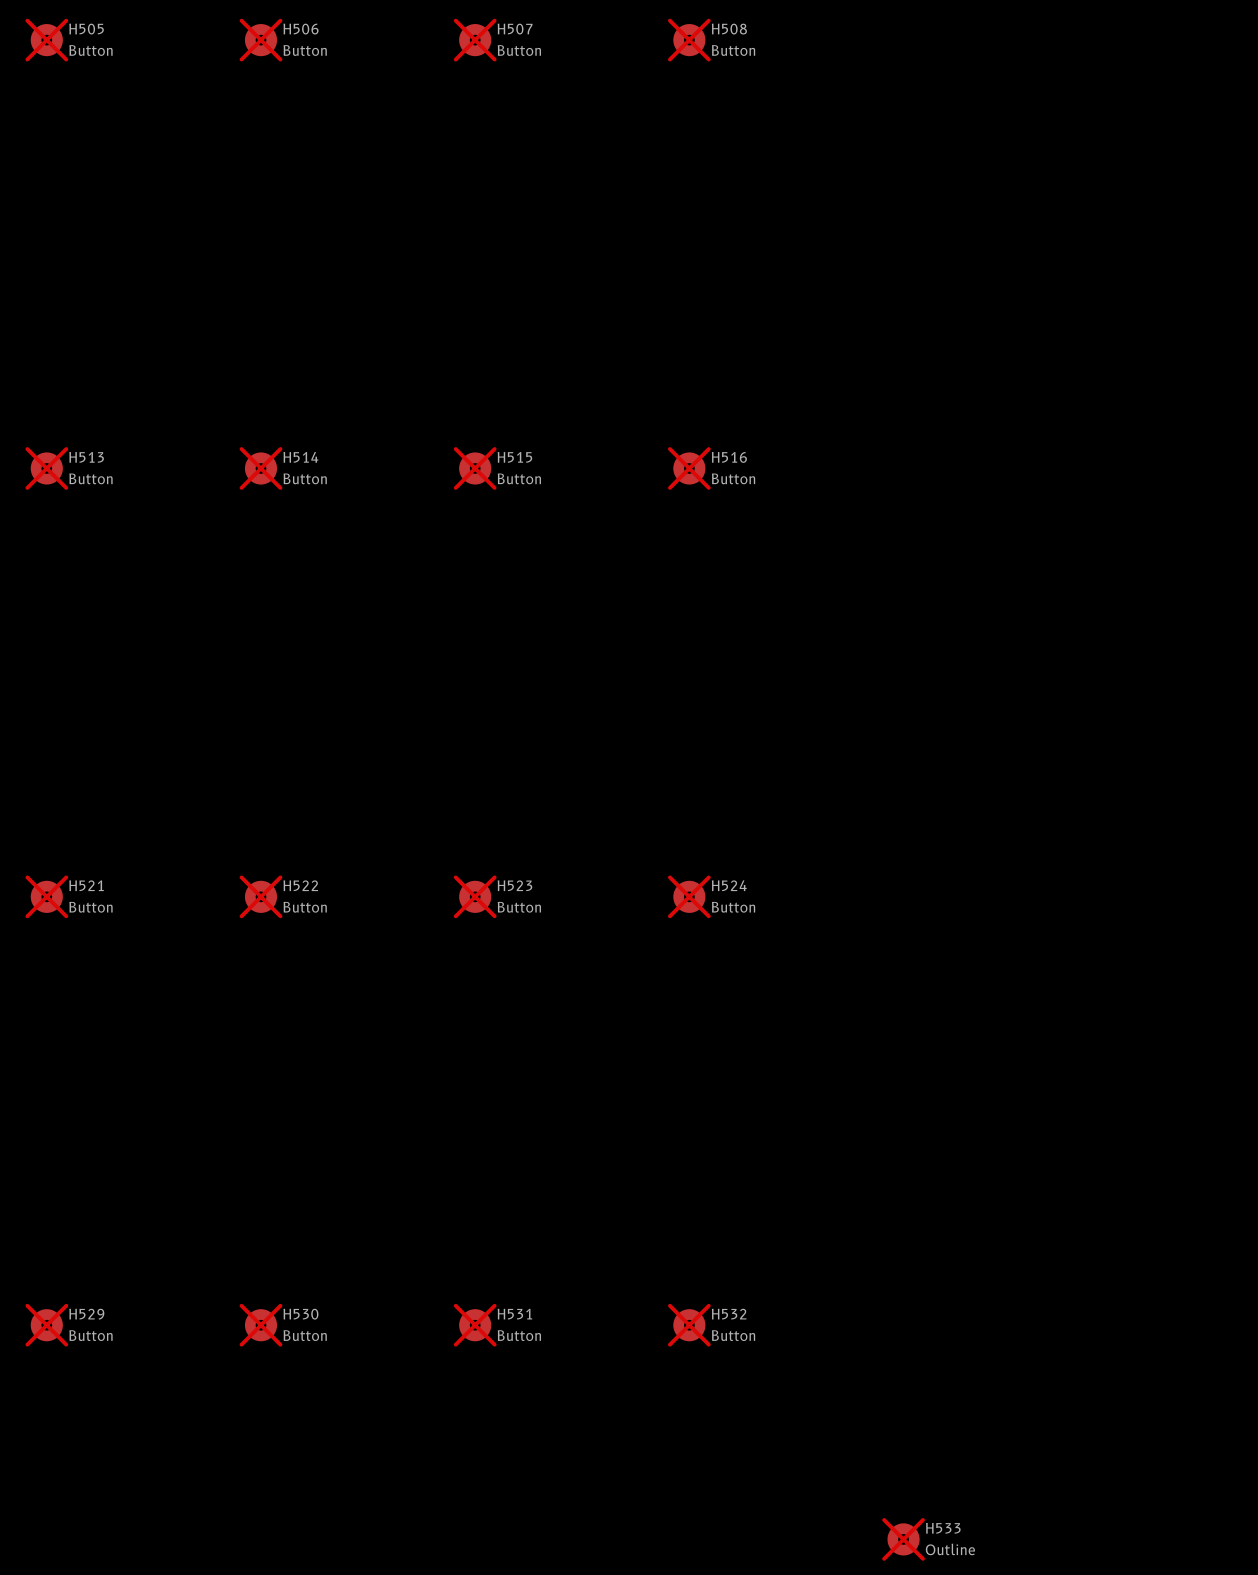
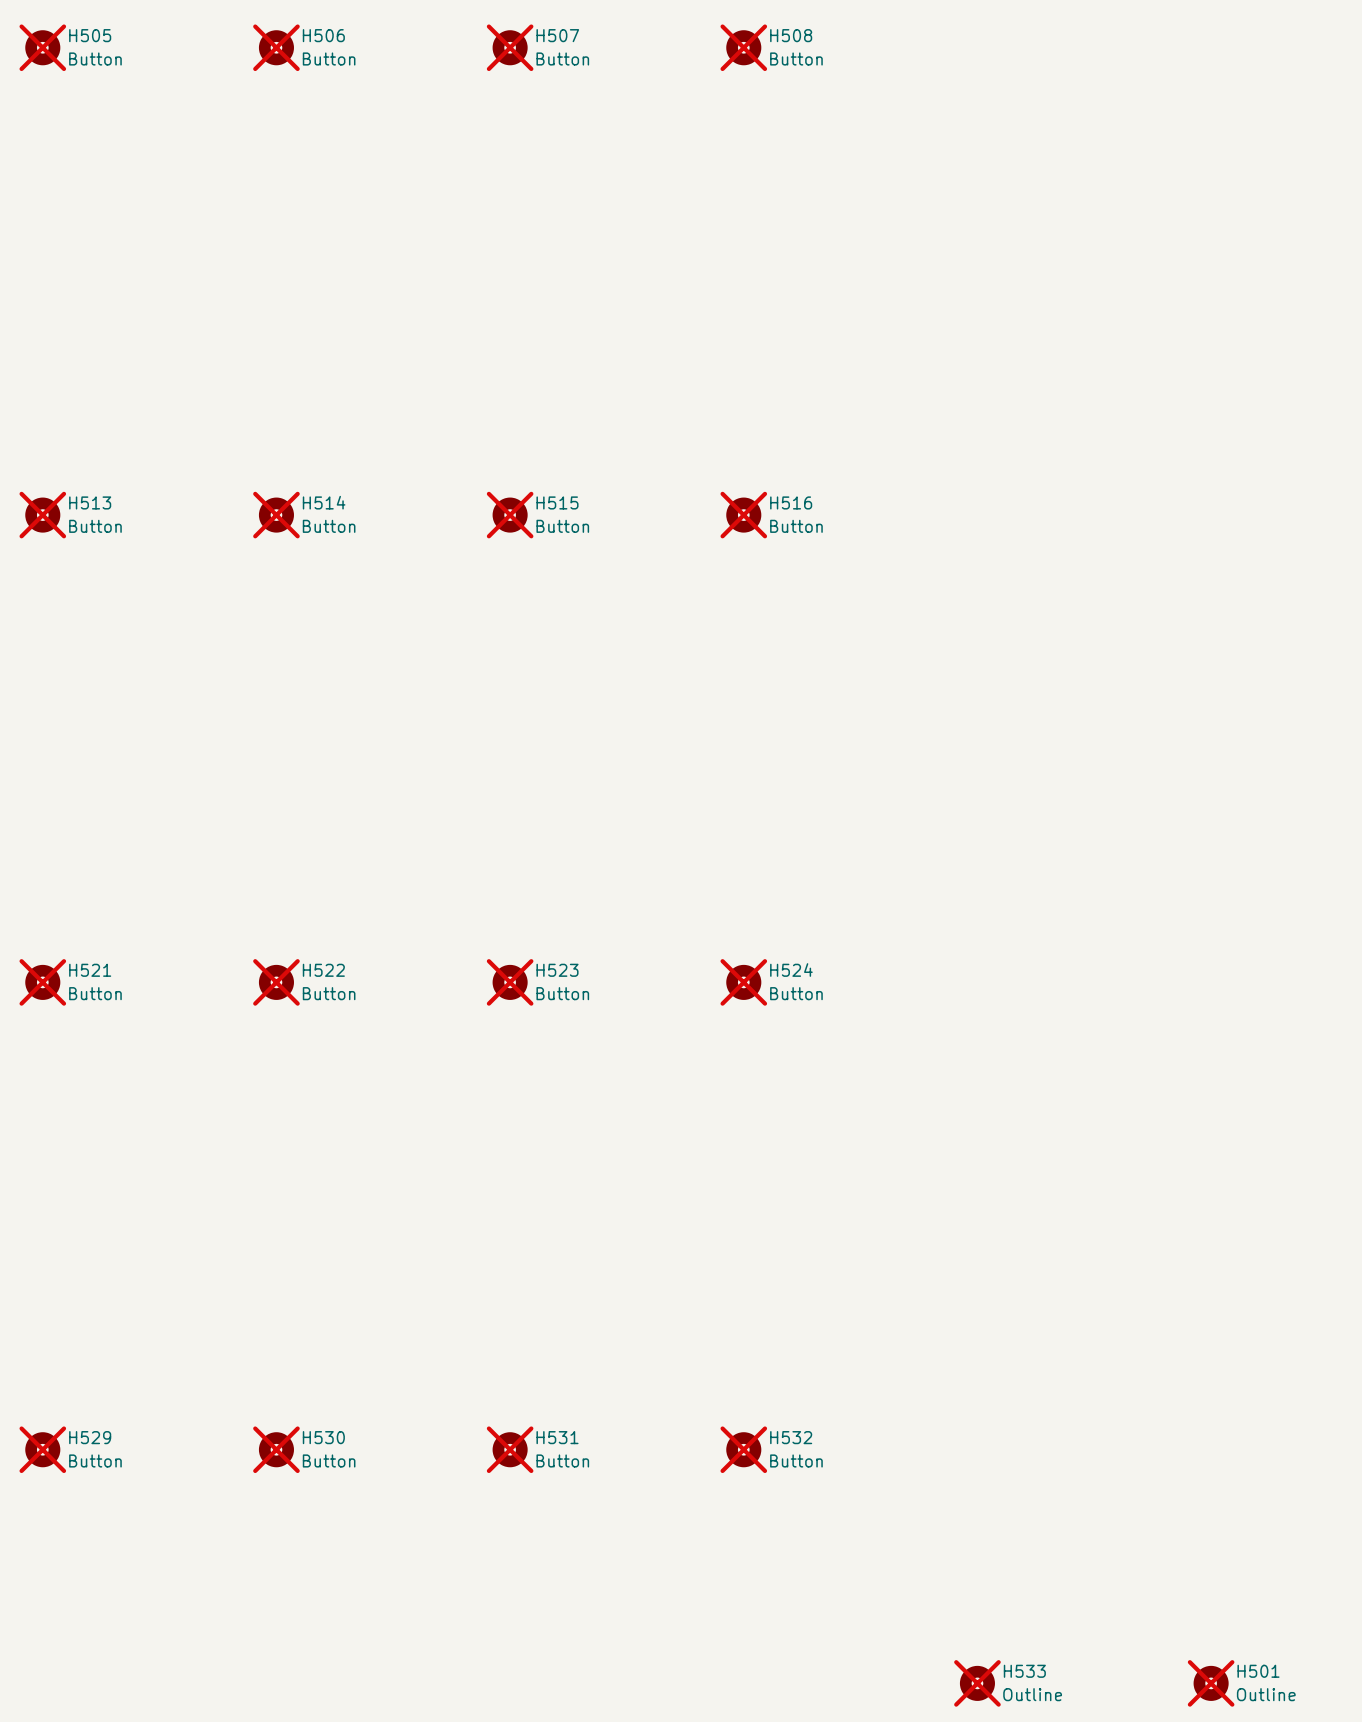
H501: none -> Outline (1211, 1683)

